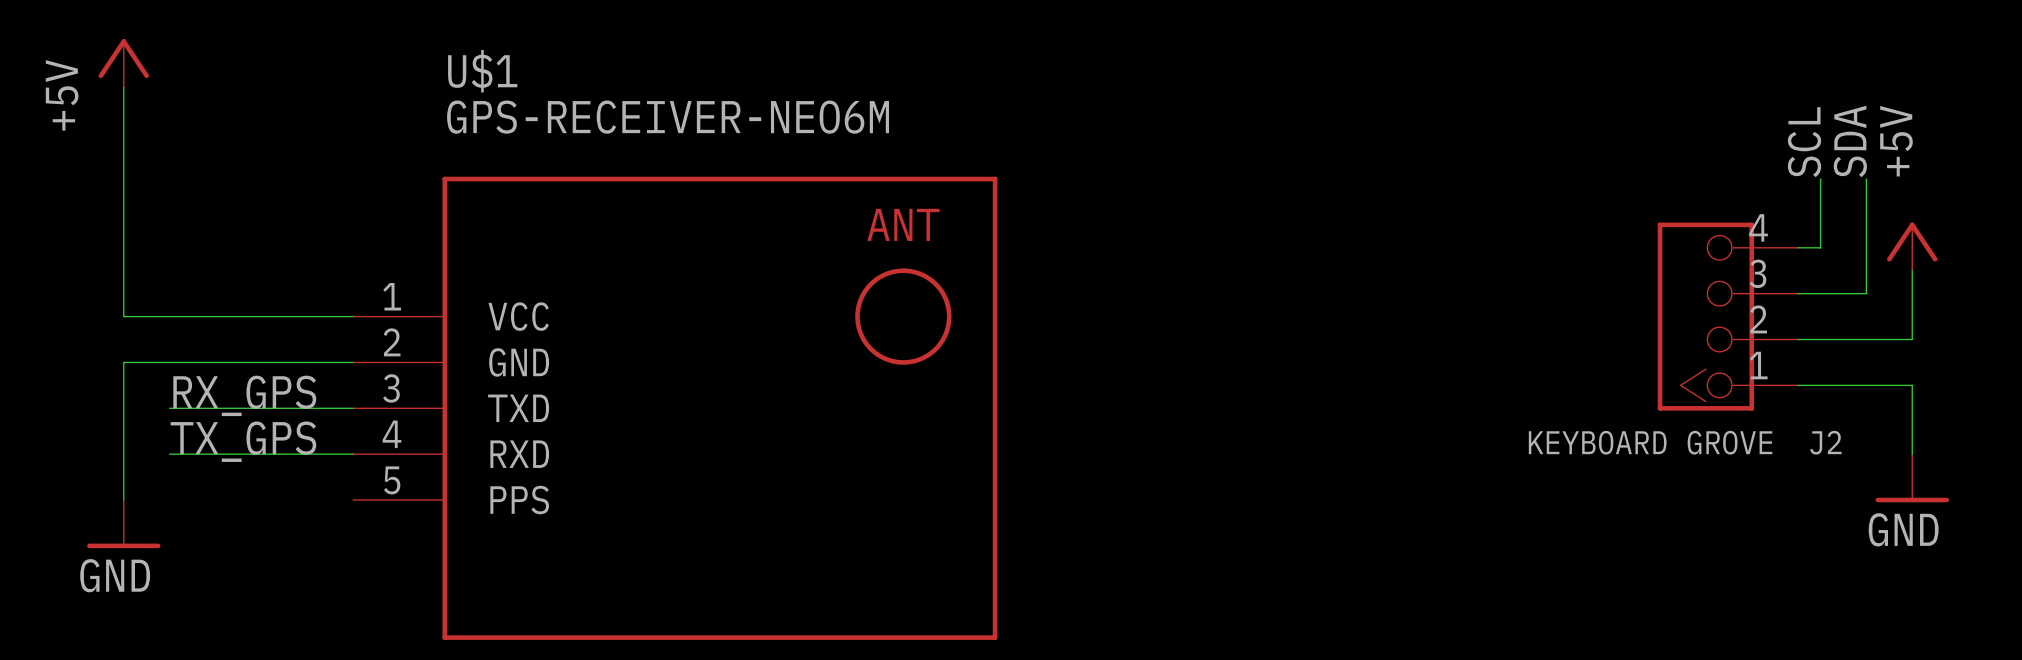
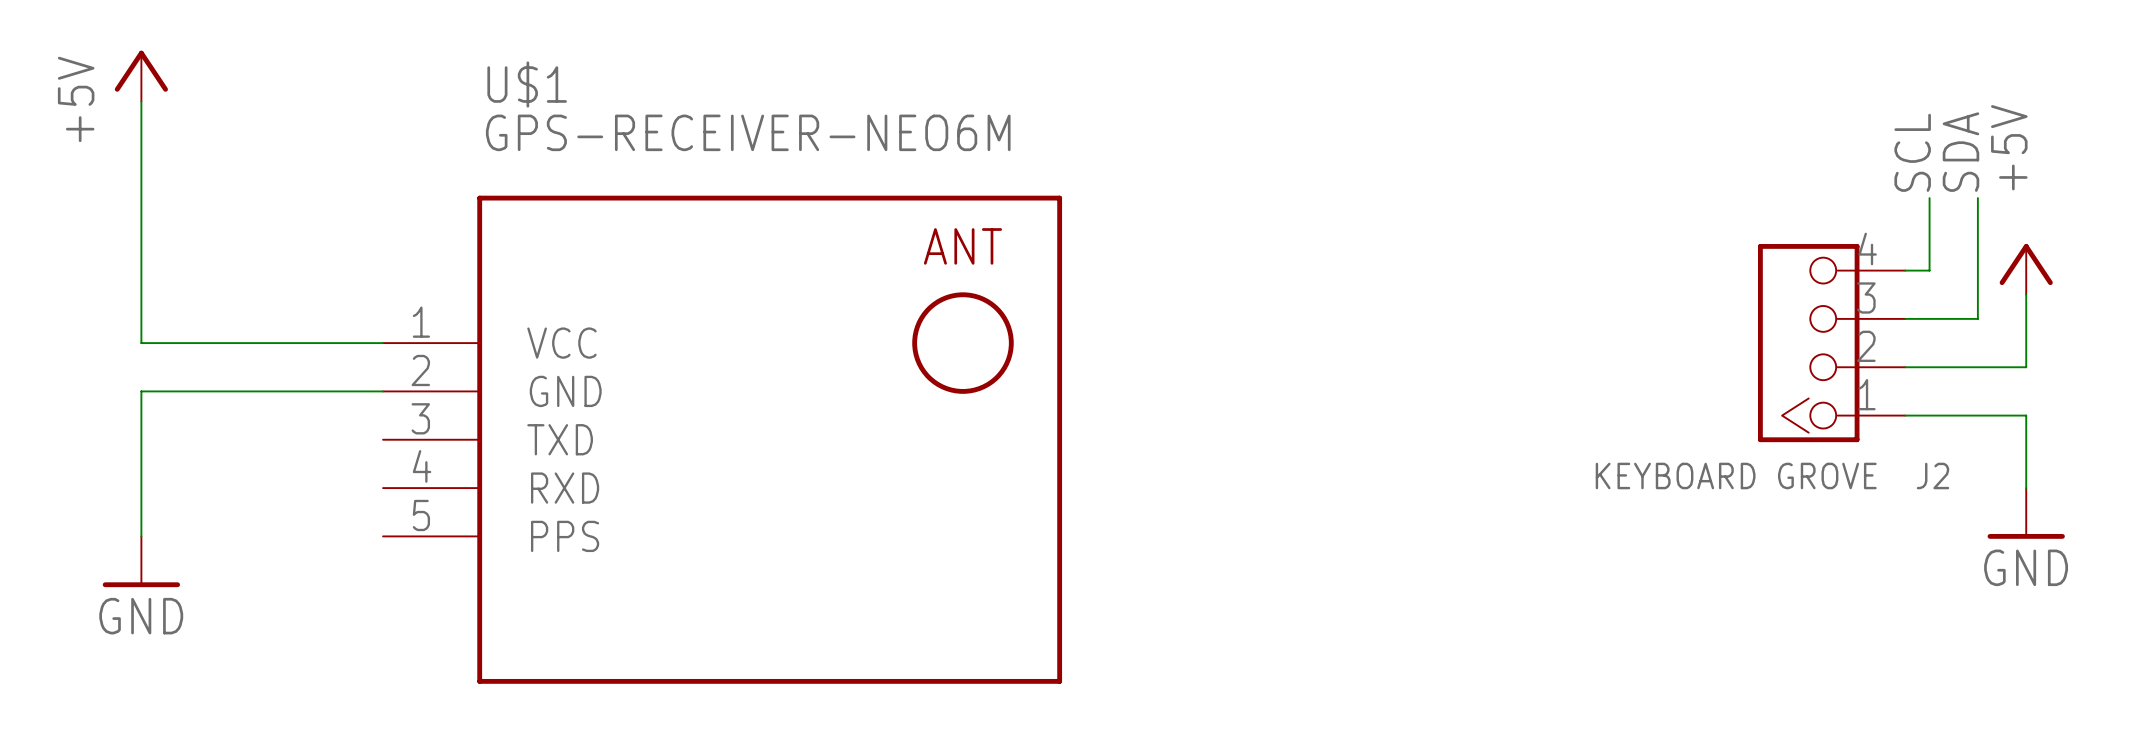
label: RX_GPS (244, 395) -> none
wire: (169, 408) (353, 408) -> none
label: TX_GPS (243, 441) -> none
wire: (169, 454) (353, 454) -> none

